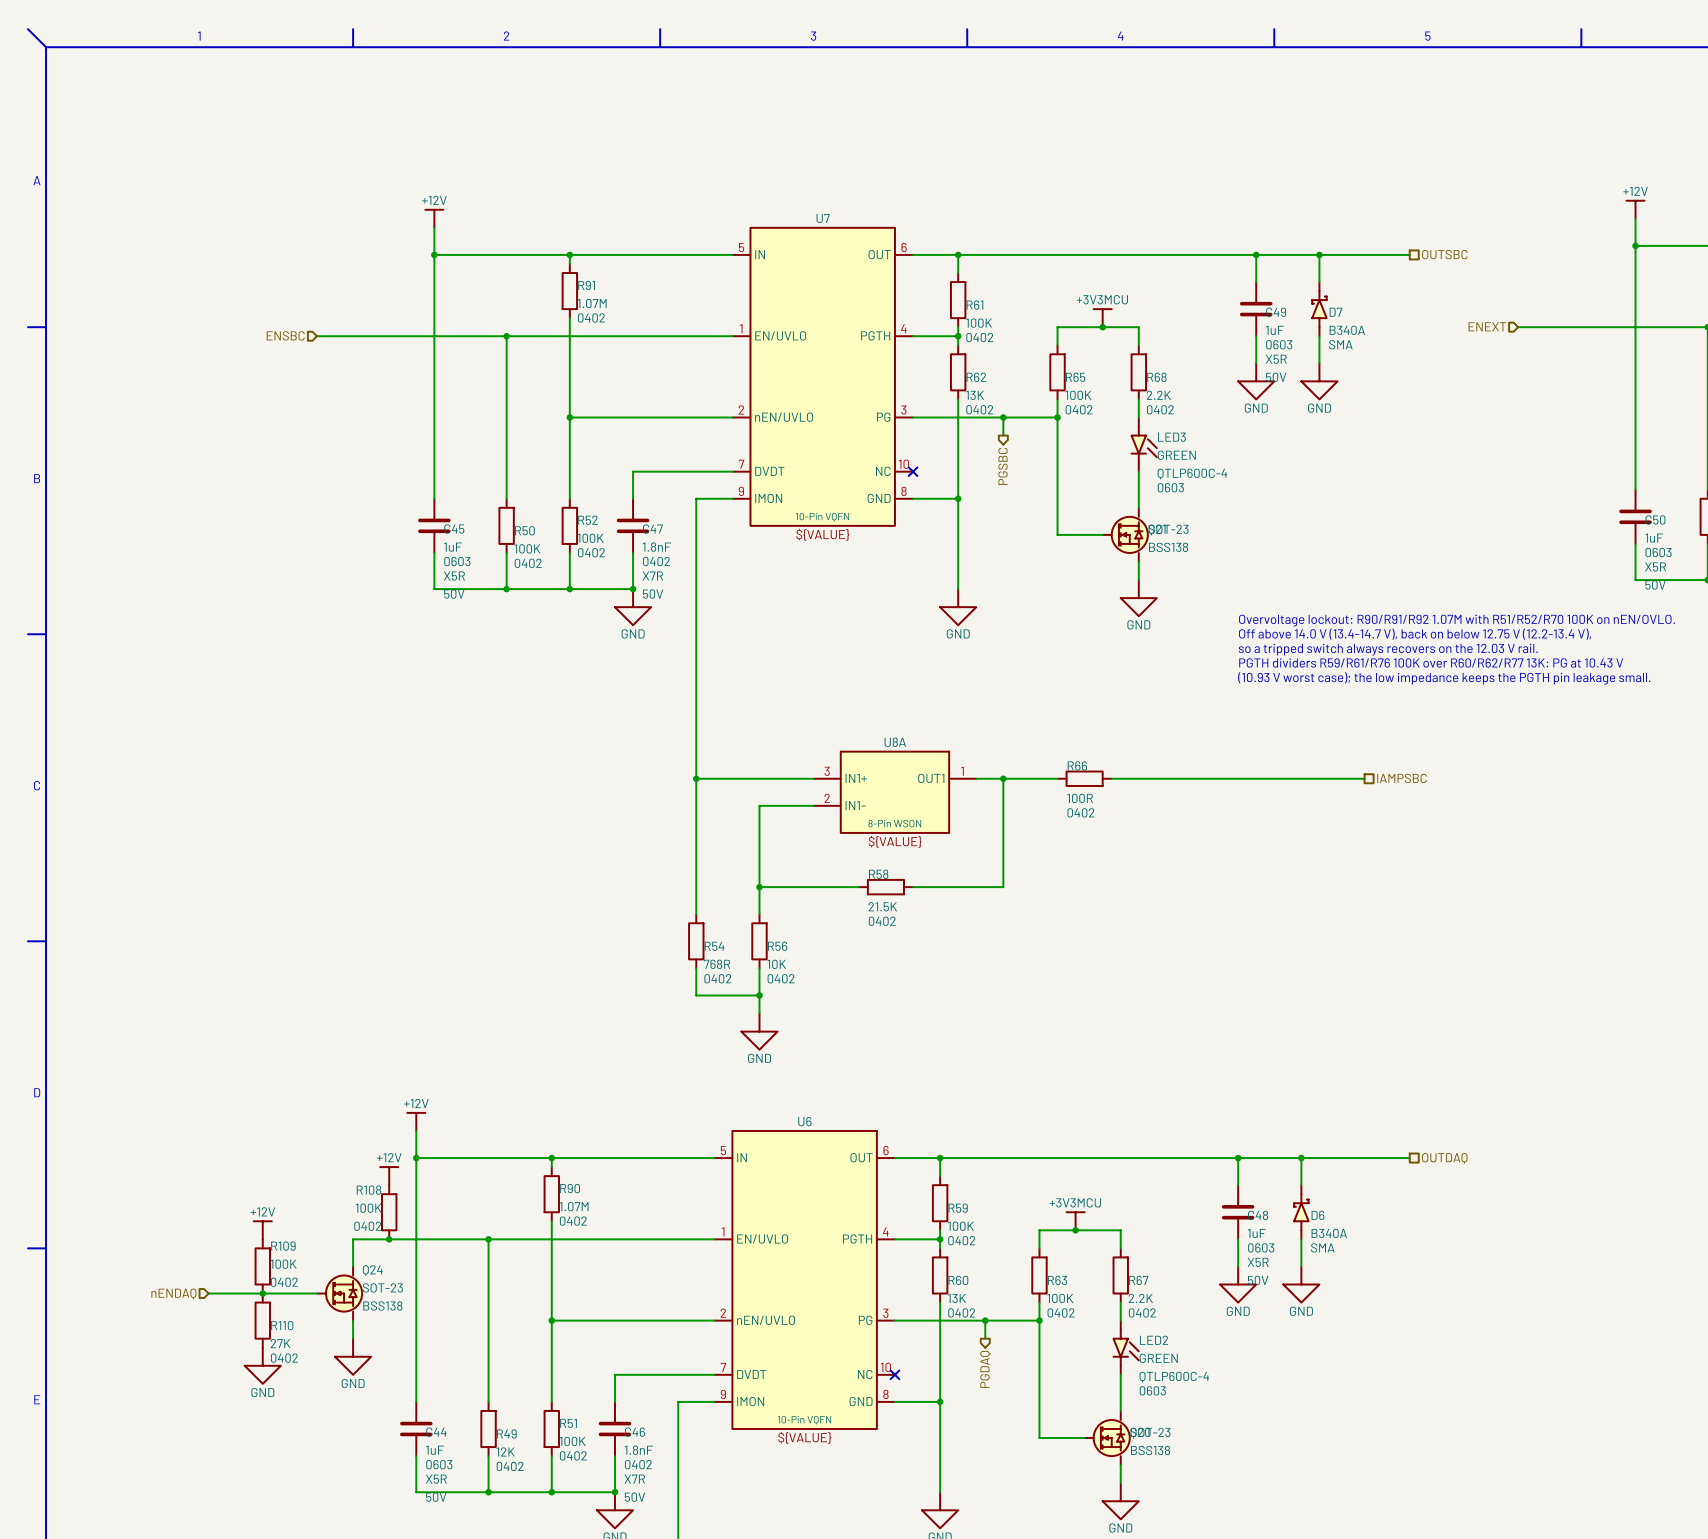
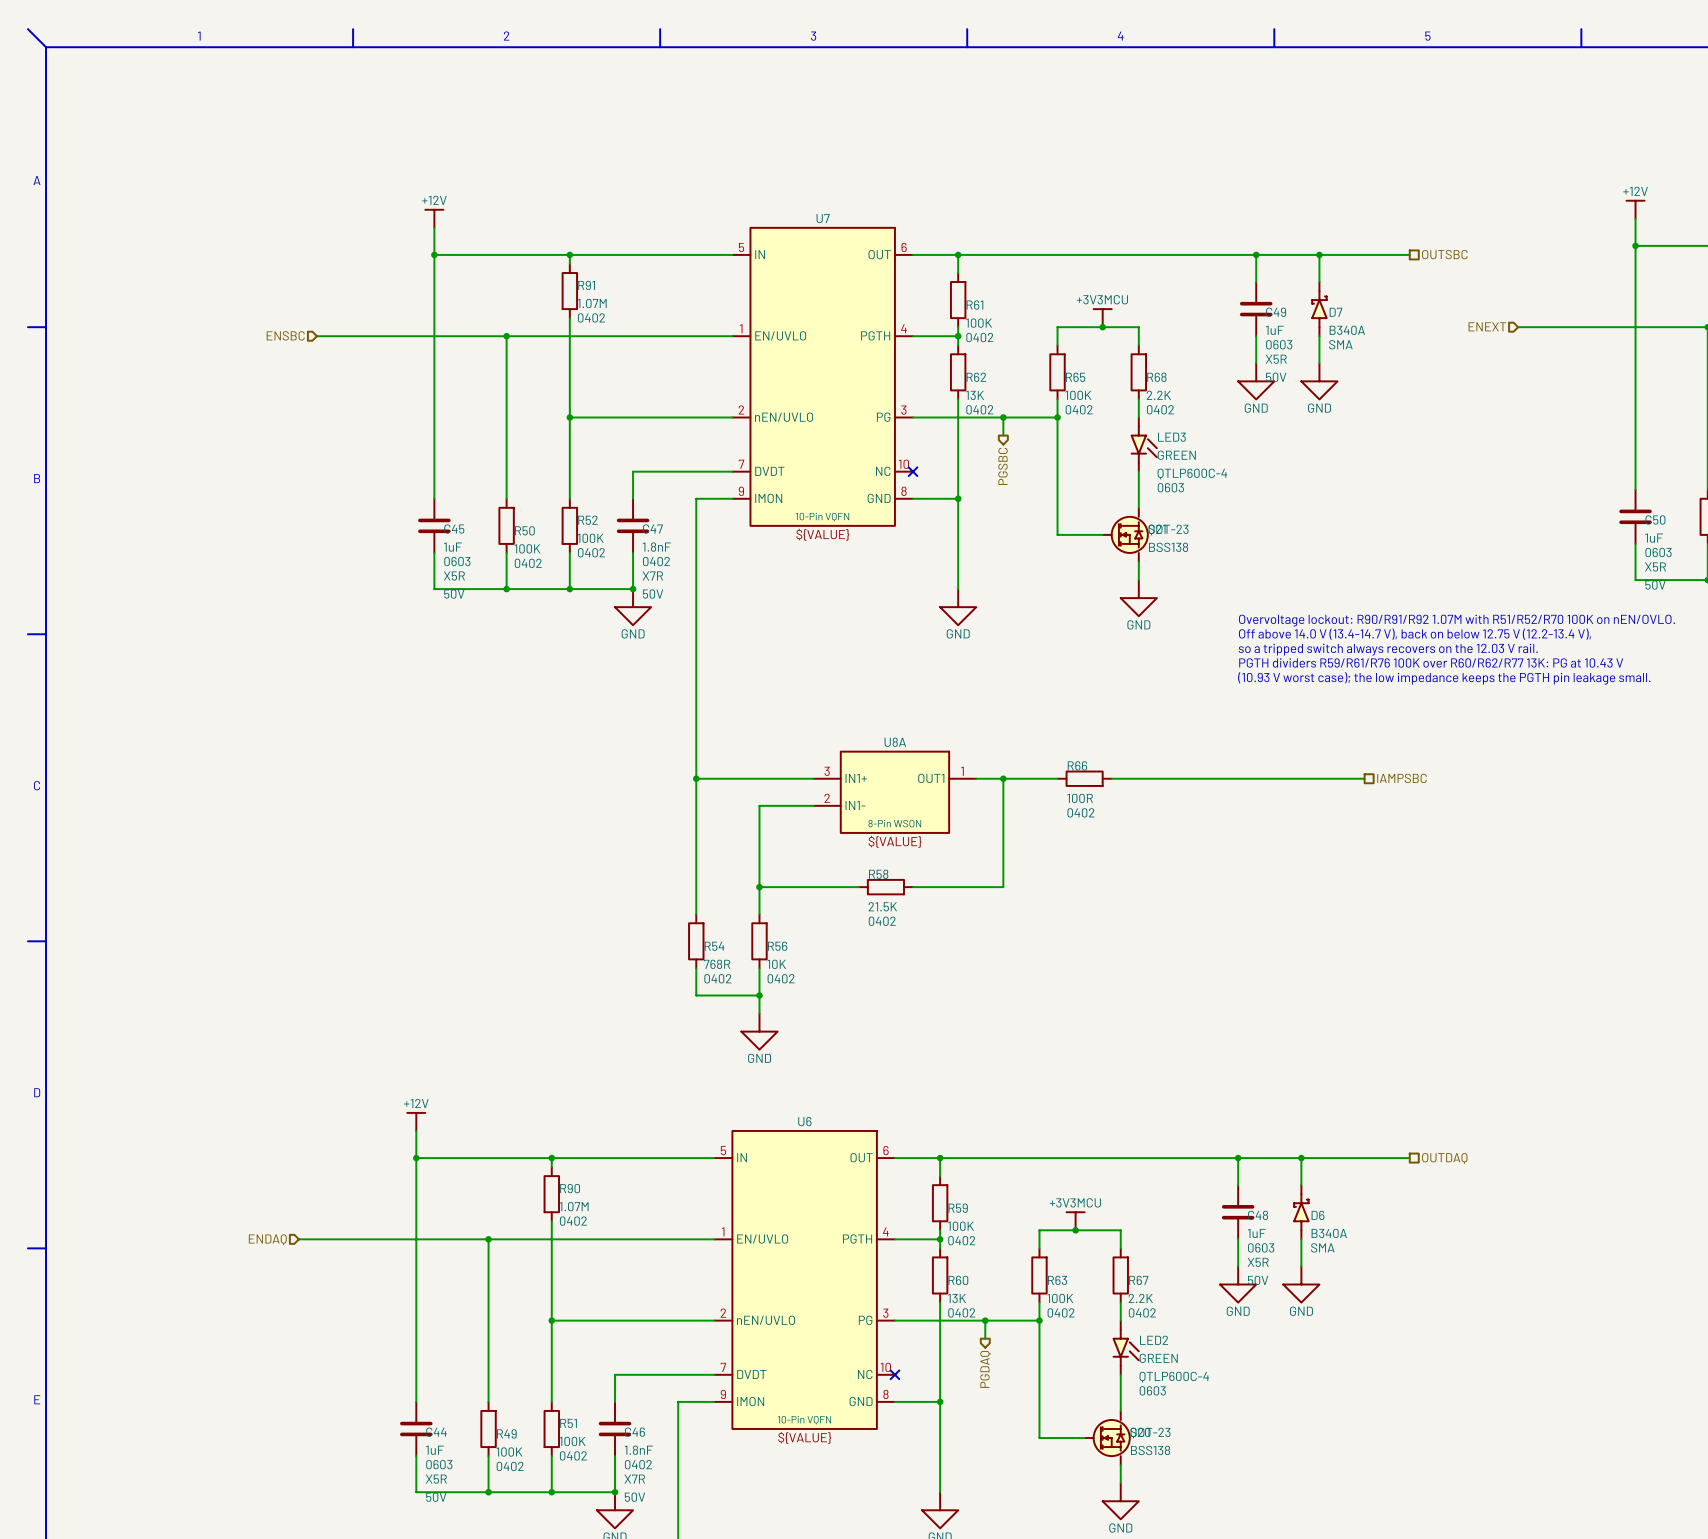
power symbol: +12V (389, 1176) -> none
R108: 100K (389, 1212) -> none
power symbol: +12V (262, 1230) -> none
hierarchical label: none -> ENDAQ (267, 1239)
wire: (353, 1239) (353, 1266) -> (353, 1239) (298, 1239)
junction: (389, 1239) -> none
R109: 100K (262, 1266) -> none
hierarchical label: nENDAQ (173, 1293) -> none
wire: (208, 1293) (316, 1293) -> none
junction: (262, 1293) -> none
Q24: (339, 1293) -> none
R110: 27K (262, 1320) -> none
wire: (353, 1320) (353, 1338) -> none
power symbol: GND (353, 1356) -> none
power symbol: GND (262, 1365) -> none
R49 value: 12K (505, 1451) -> 100K (509, 1452)

